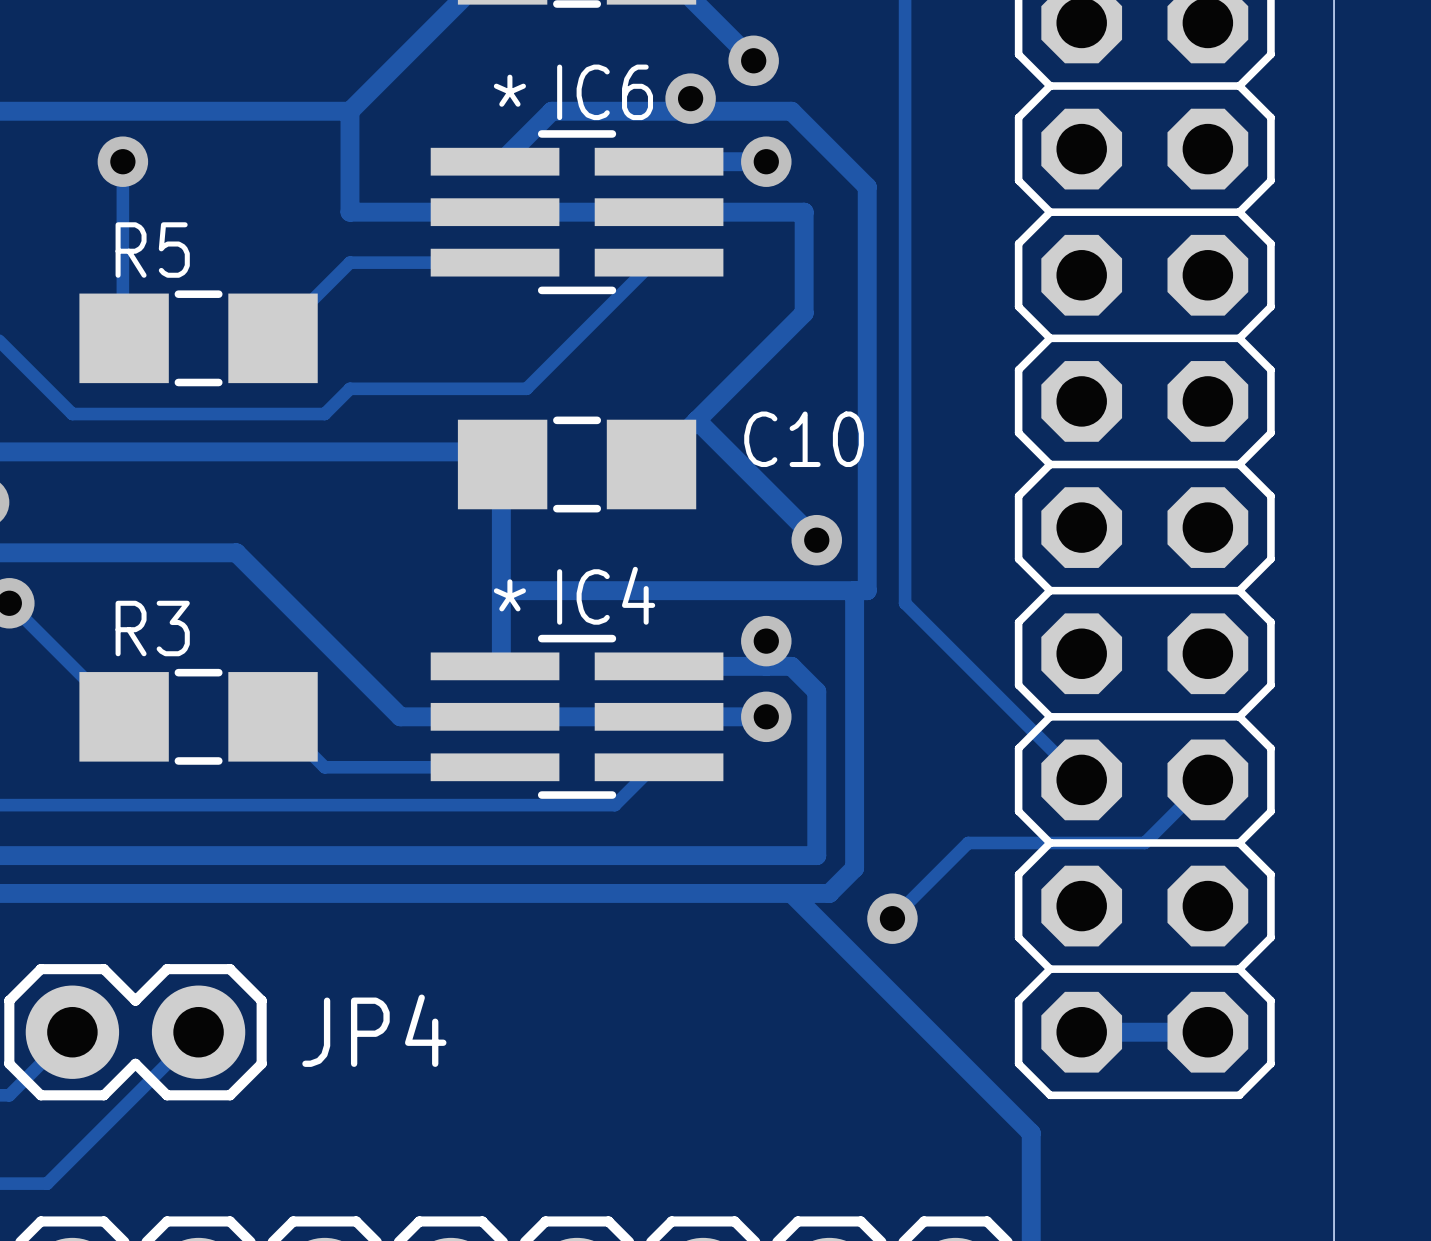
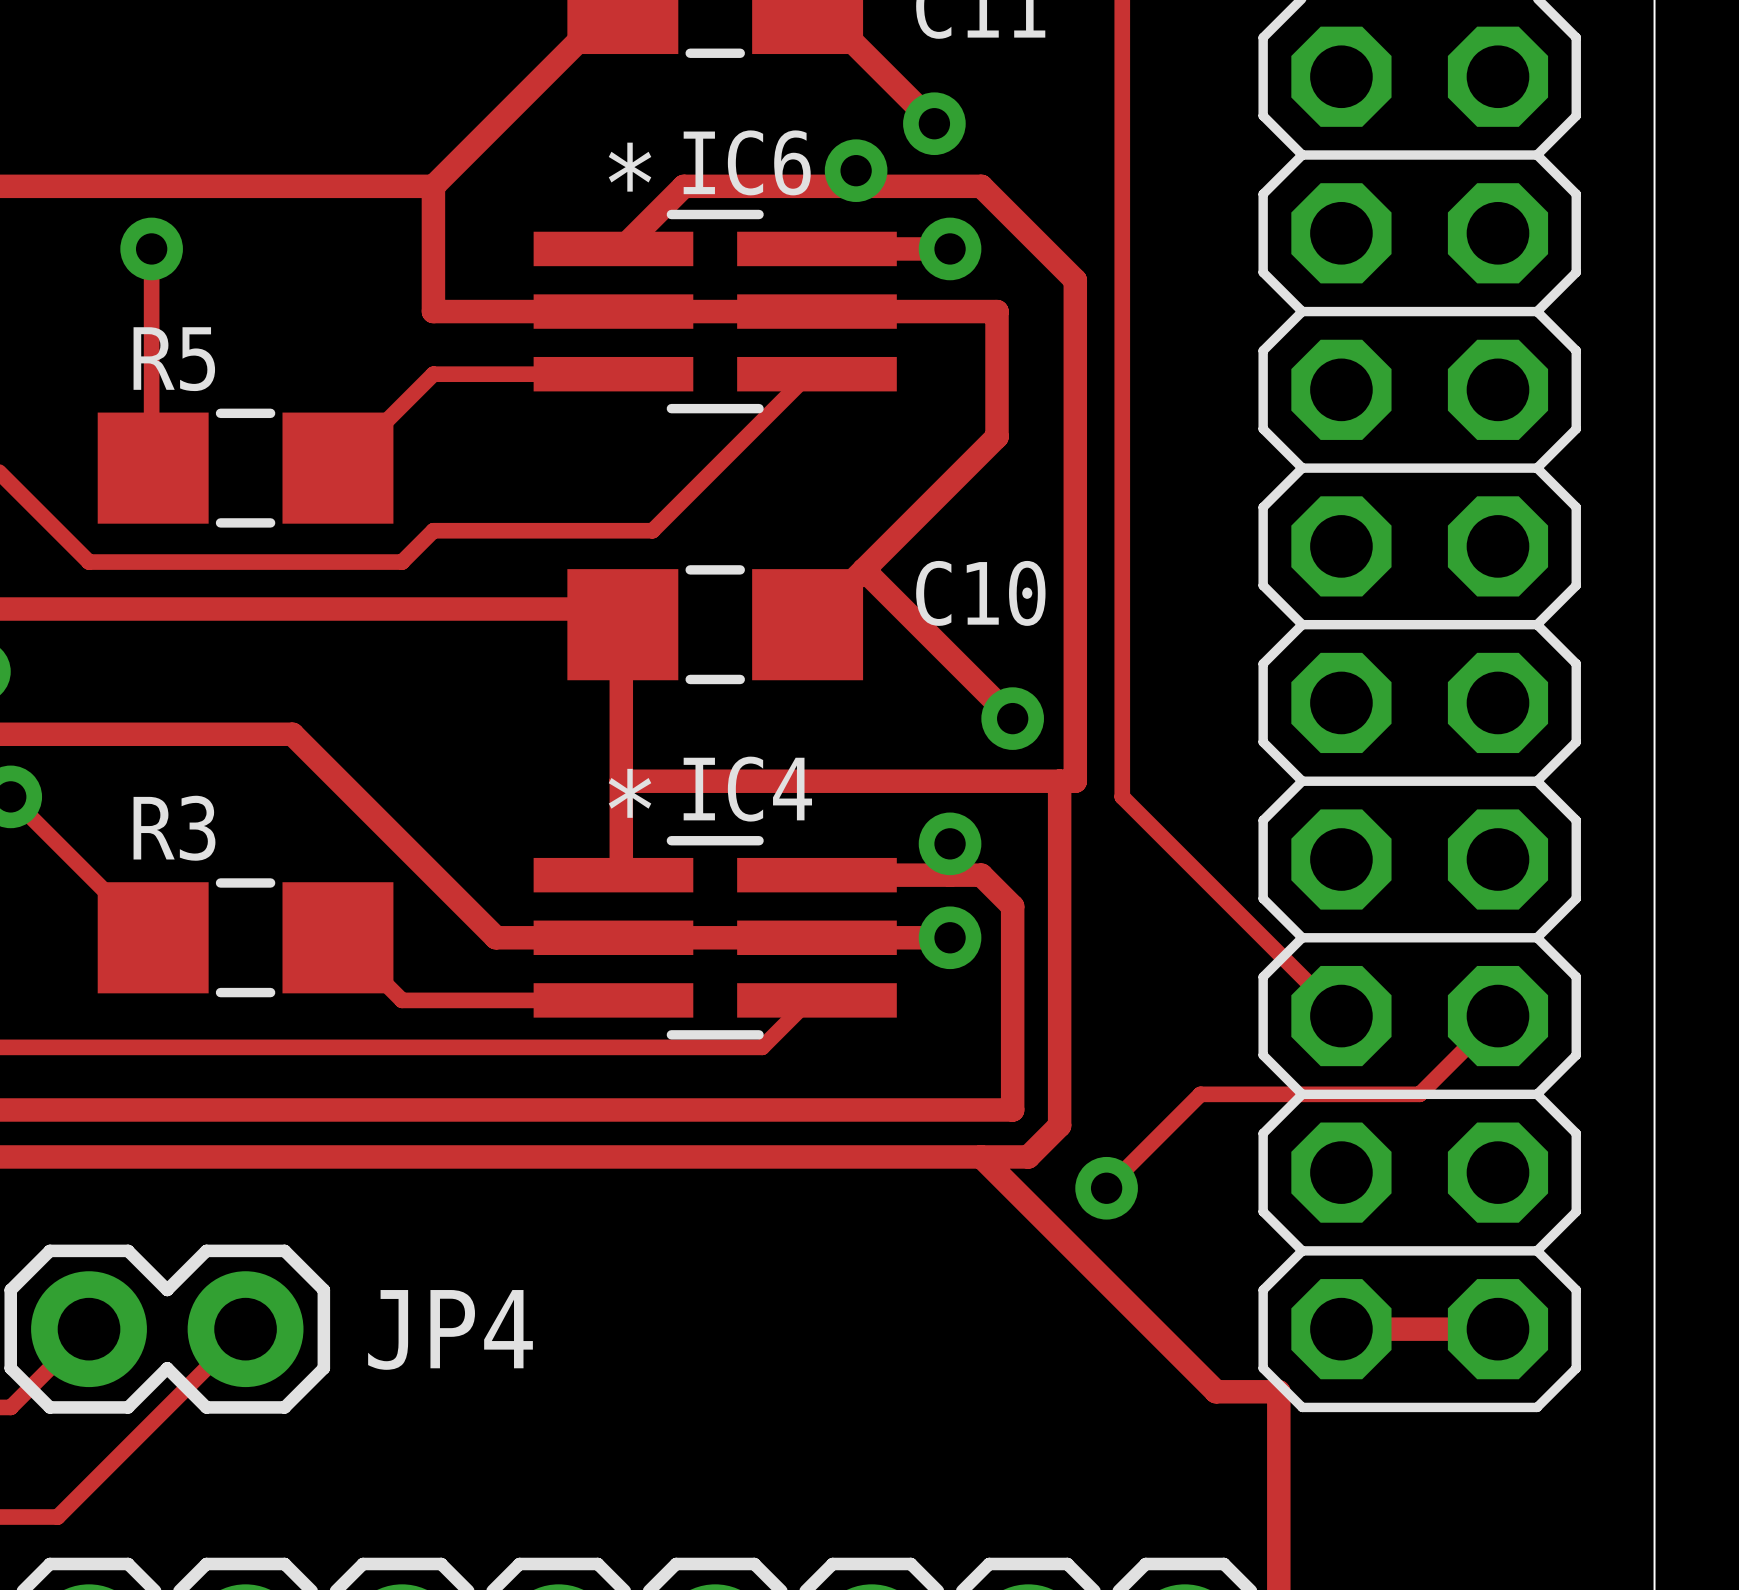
track: (980, 1082) (1031, 1133) -> (1216, 1391) (1278, 1391) (1278, 1454)

